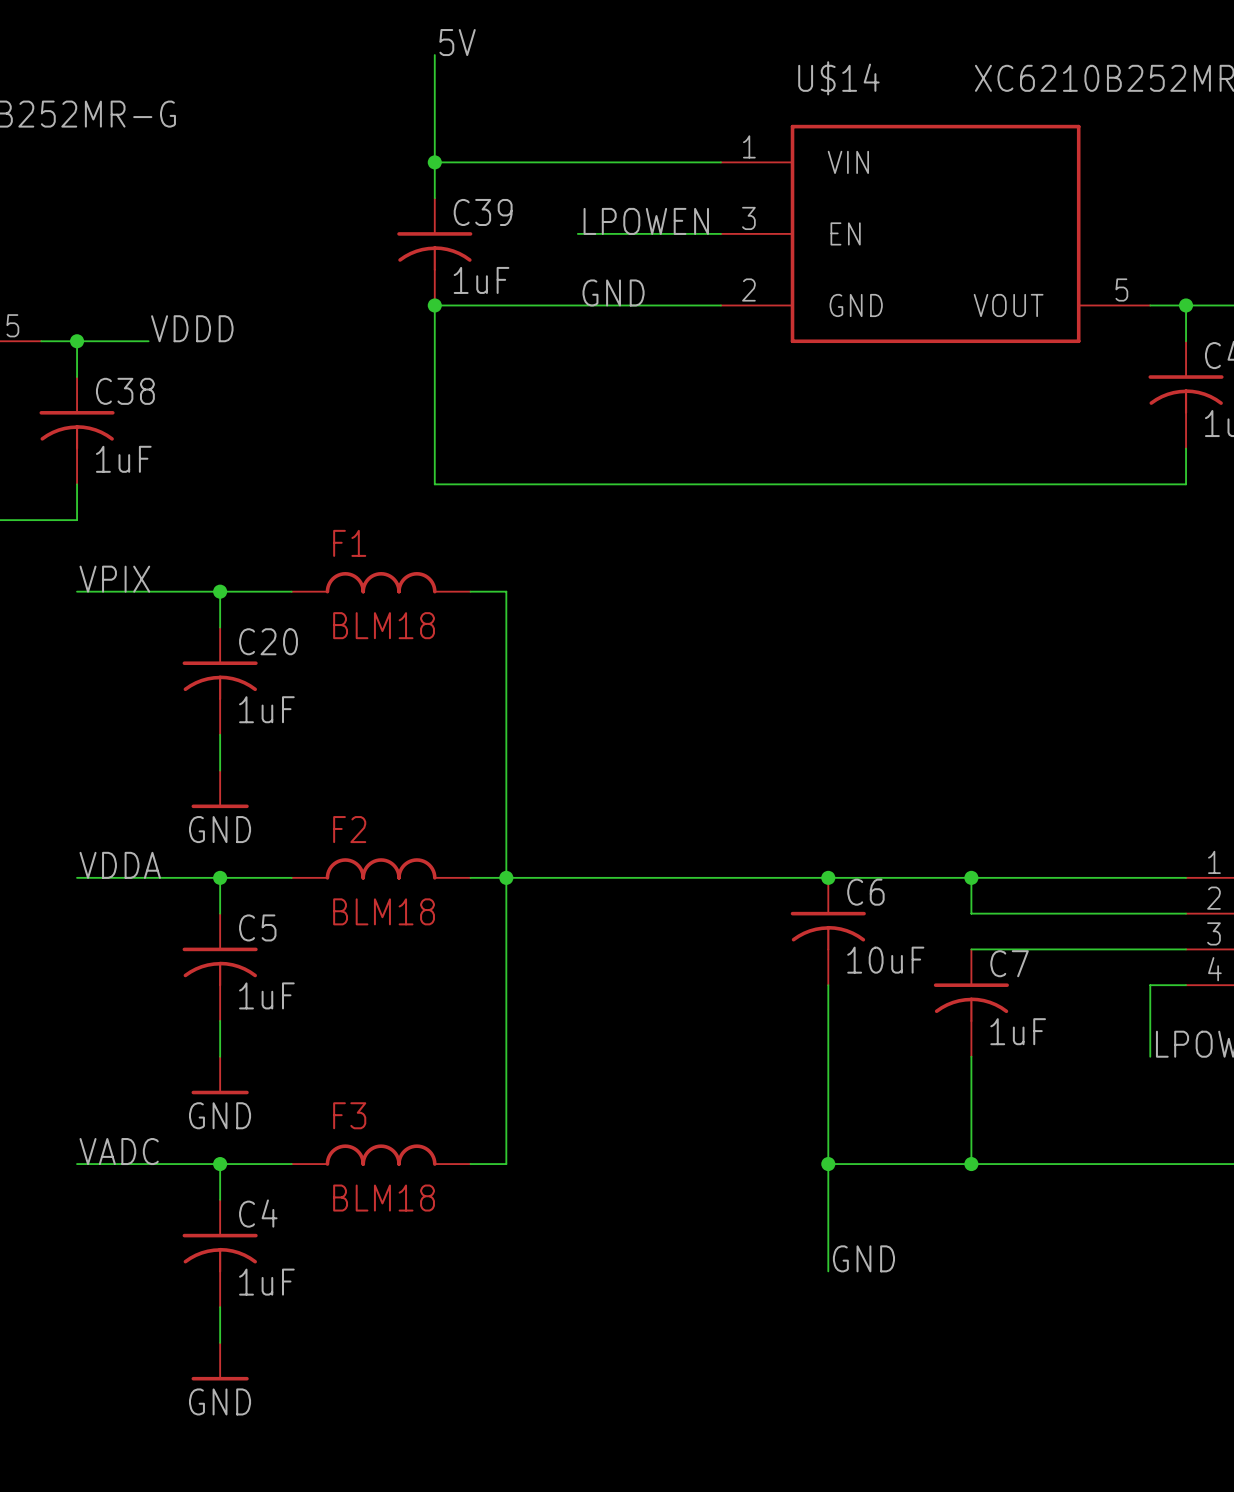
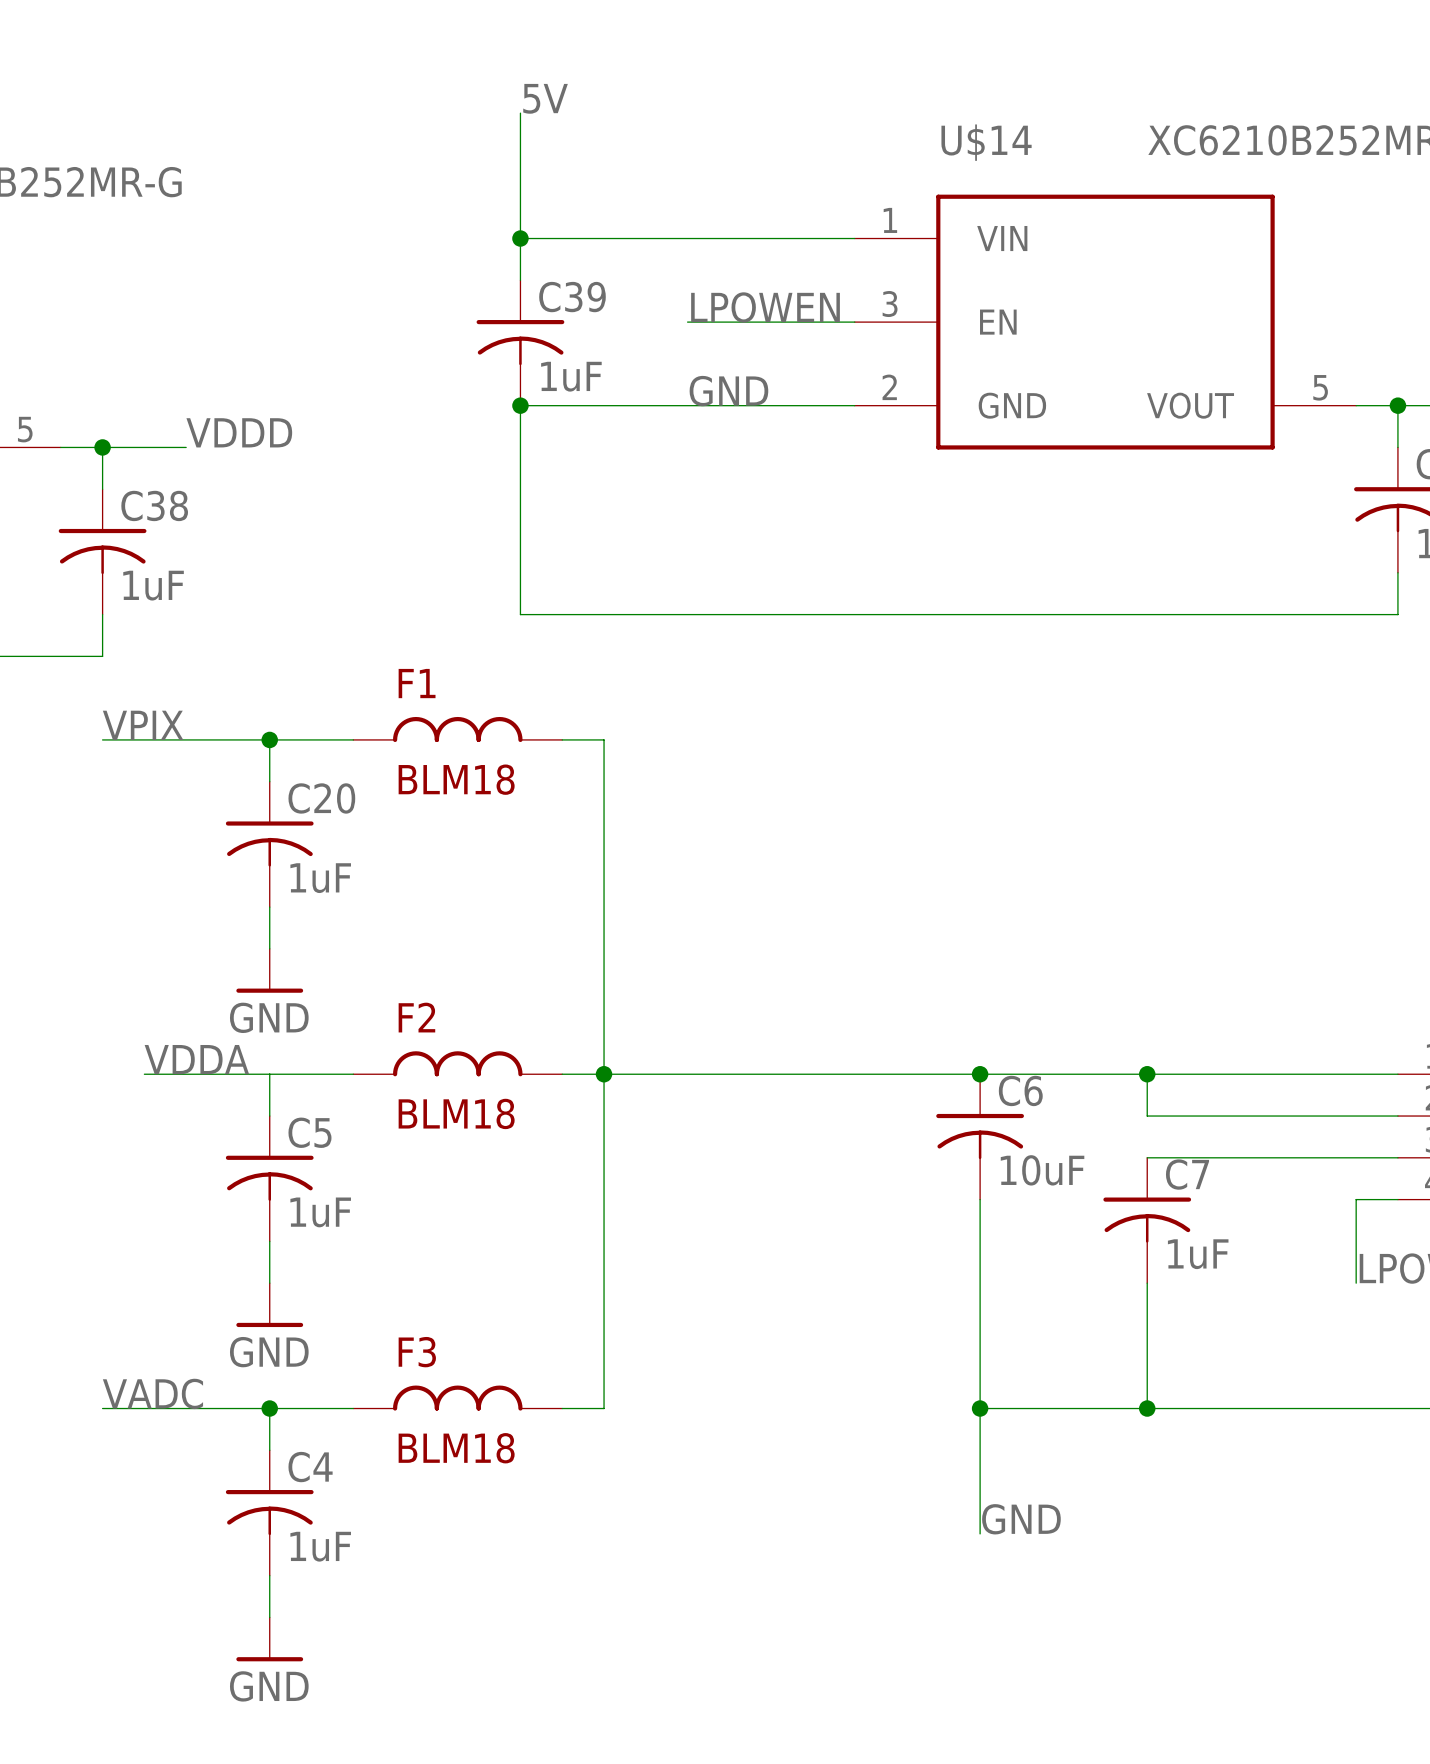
label position: VDDA (120, 865) -> VDDA (196, 1059)
wire: (77, 877) (112, 877) -> none
junction: (220, 877) -> none

